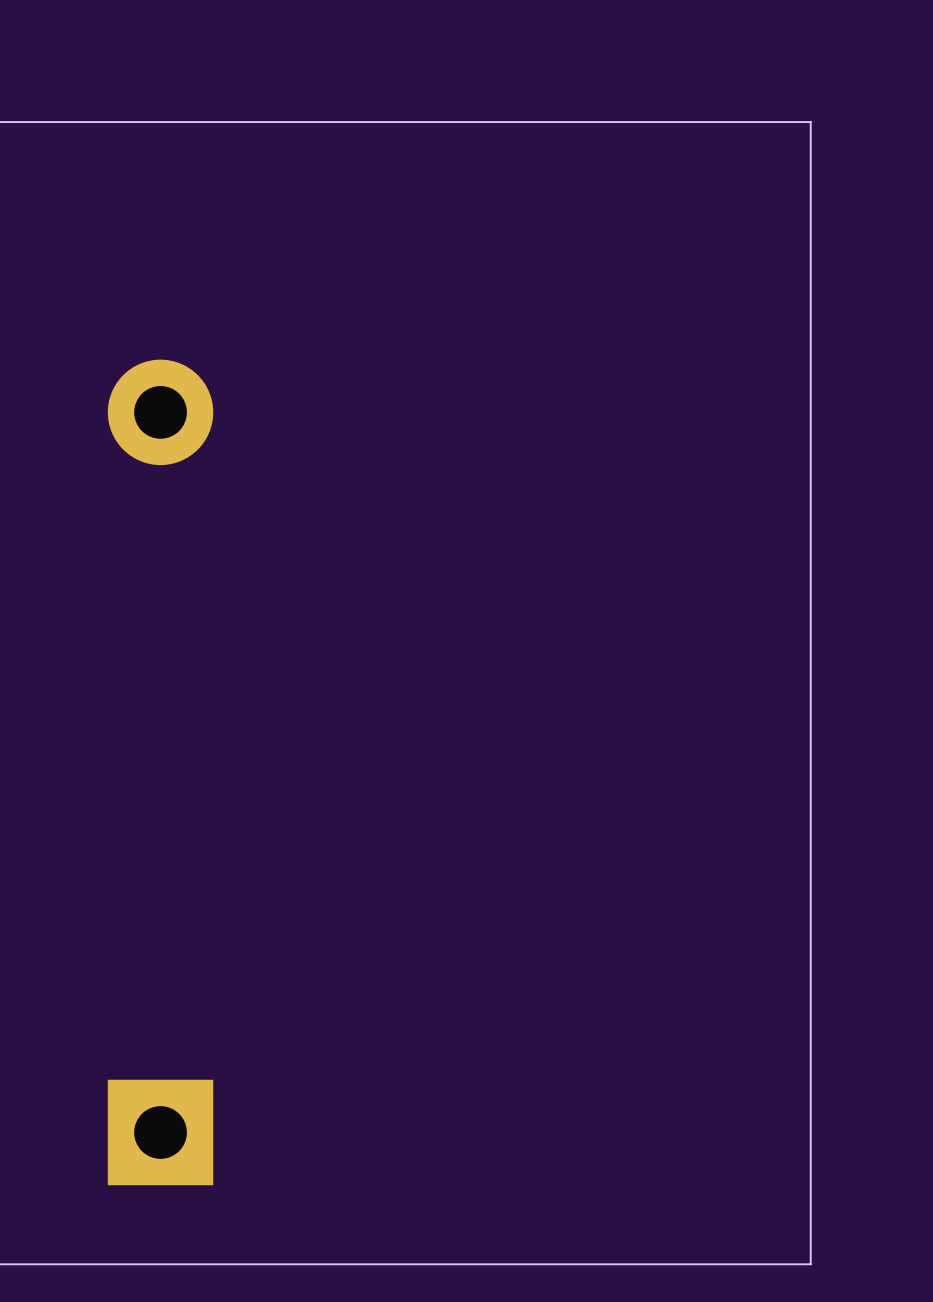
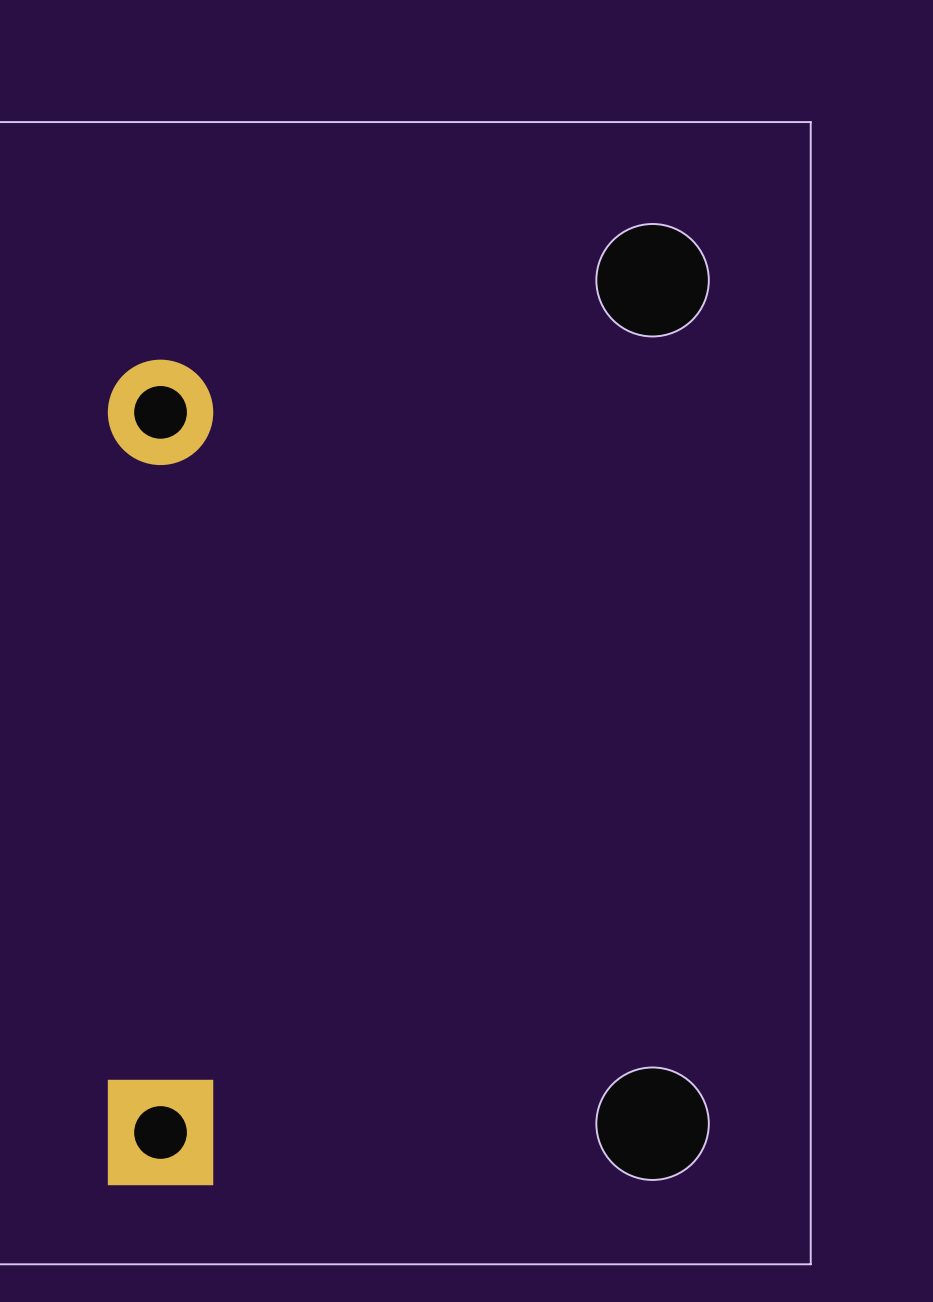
part: none -> (652, 280)
part: none -> (652, 1123)

